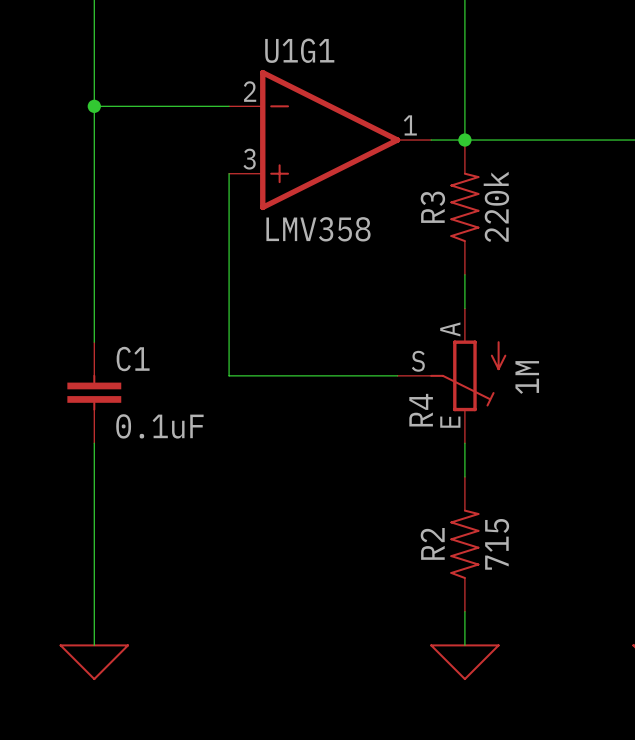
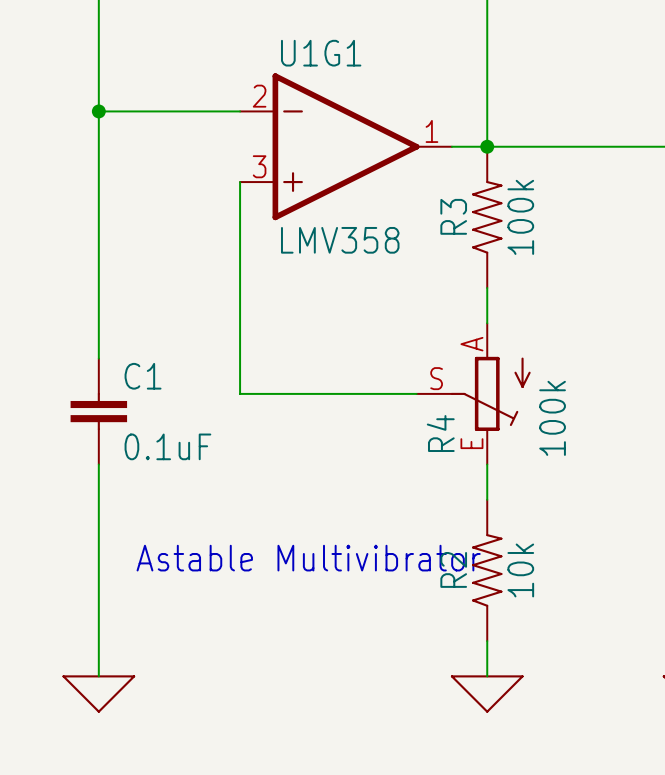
R3 value: 220k (496, 206) -> 100k (520, 217)
R4 value: 1M (527, 377) -> 100k (552, 418)
text: none -> Astable Multivibrator (308, 558)
R2 value: 715 (497, 544) -> 10k (520, 570)

